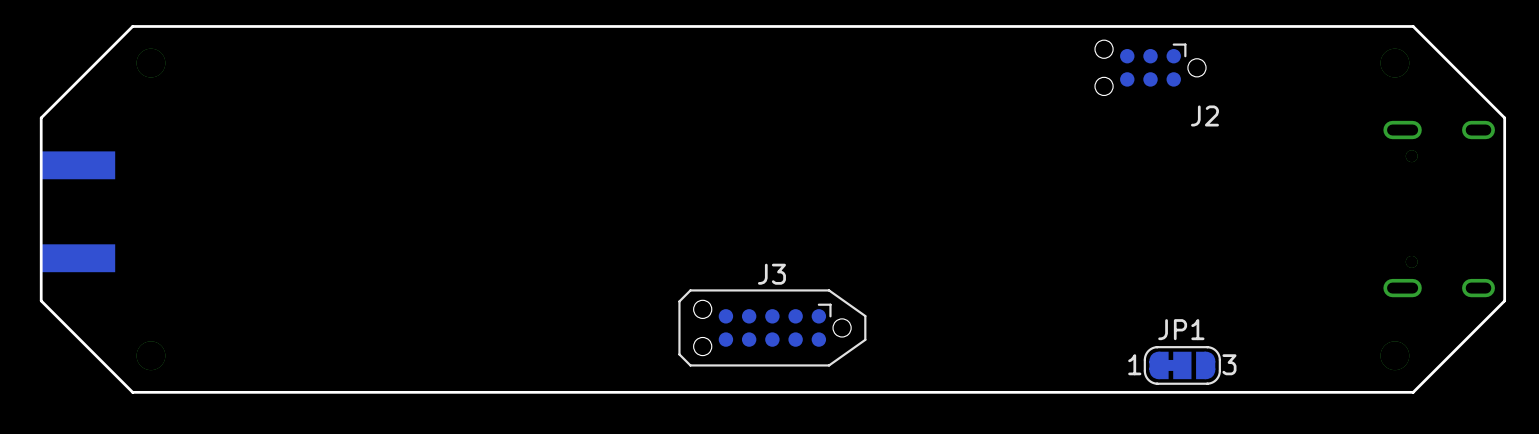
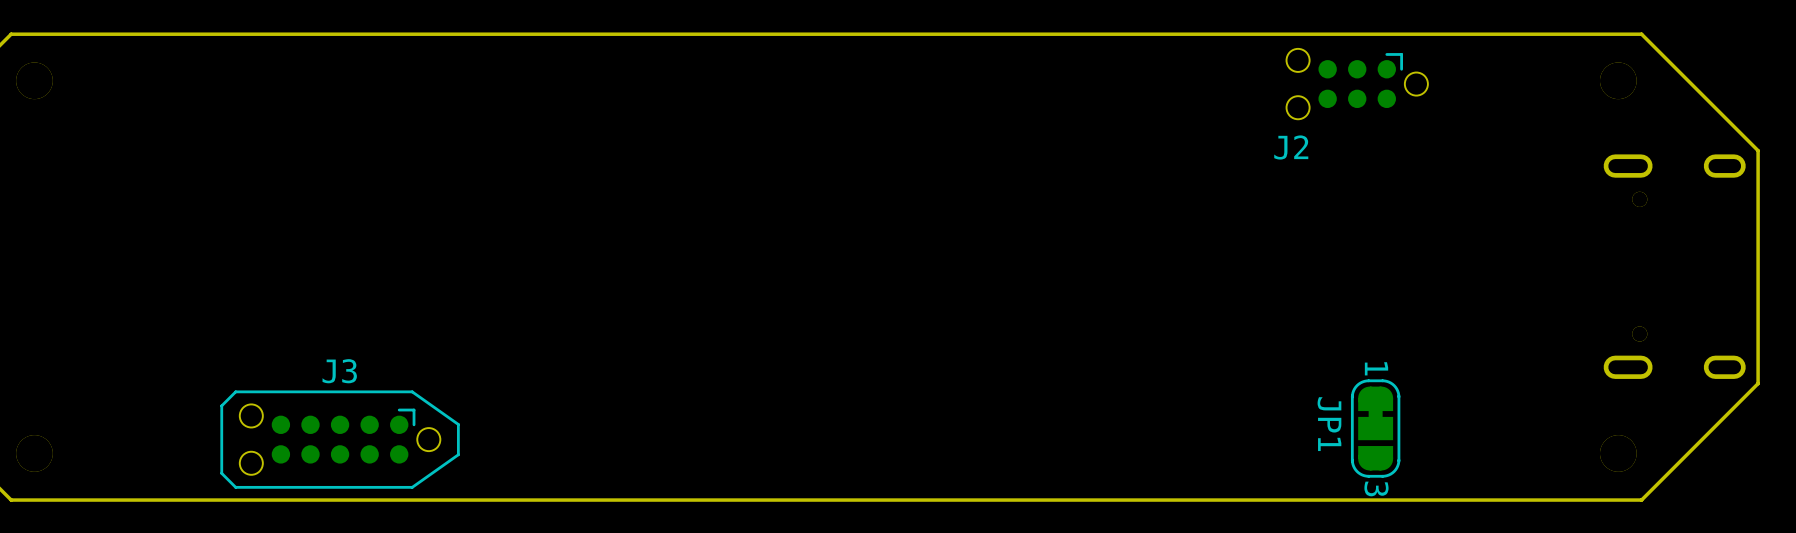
J2 position: (1150, 67) -> (1357, 84)
J2 name position: J2 (1204, 115) -> J2 (1291, 147)
J3 position: (772, 327) -> (340, 439)
JP1 name position: JP1 (1181, 329) -> JP1 (1329, 424)
JP1 rotation: 0° (1182, 365) -> 90° clockwise (1375, 428)

